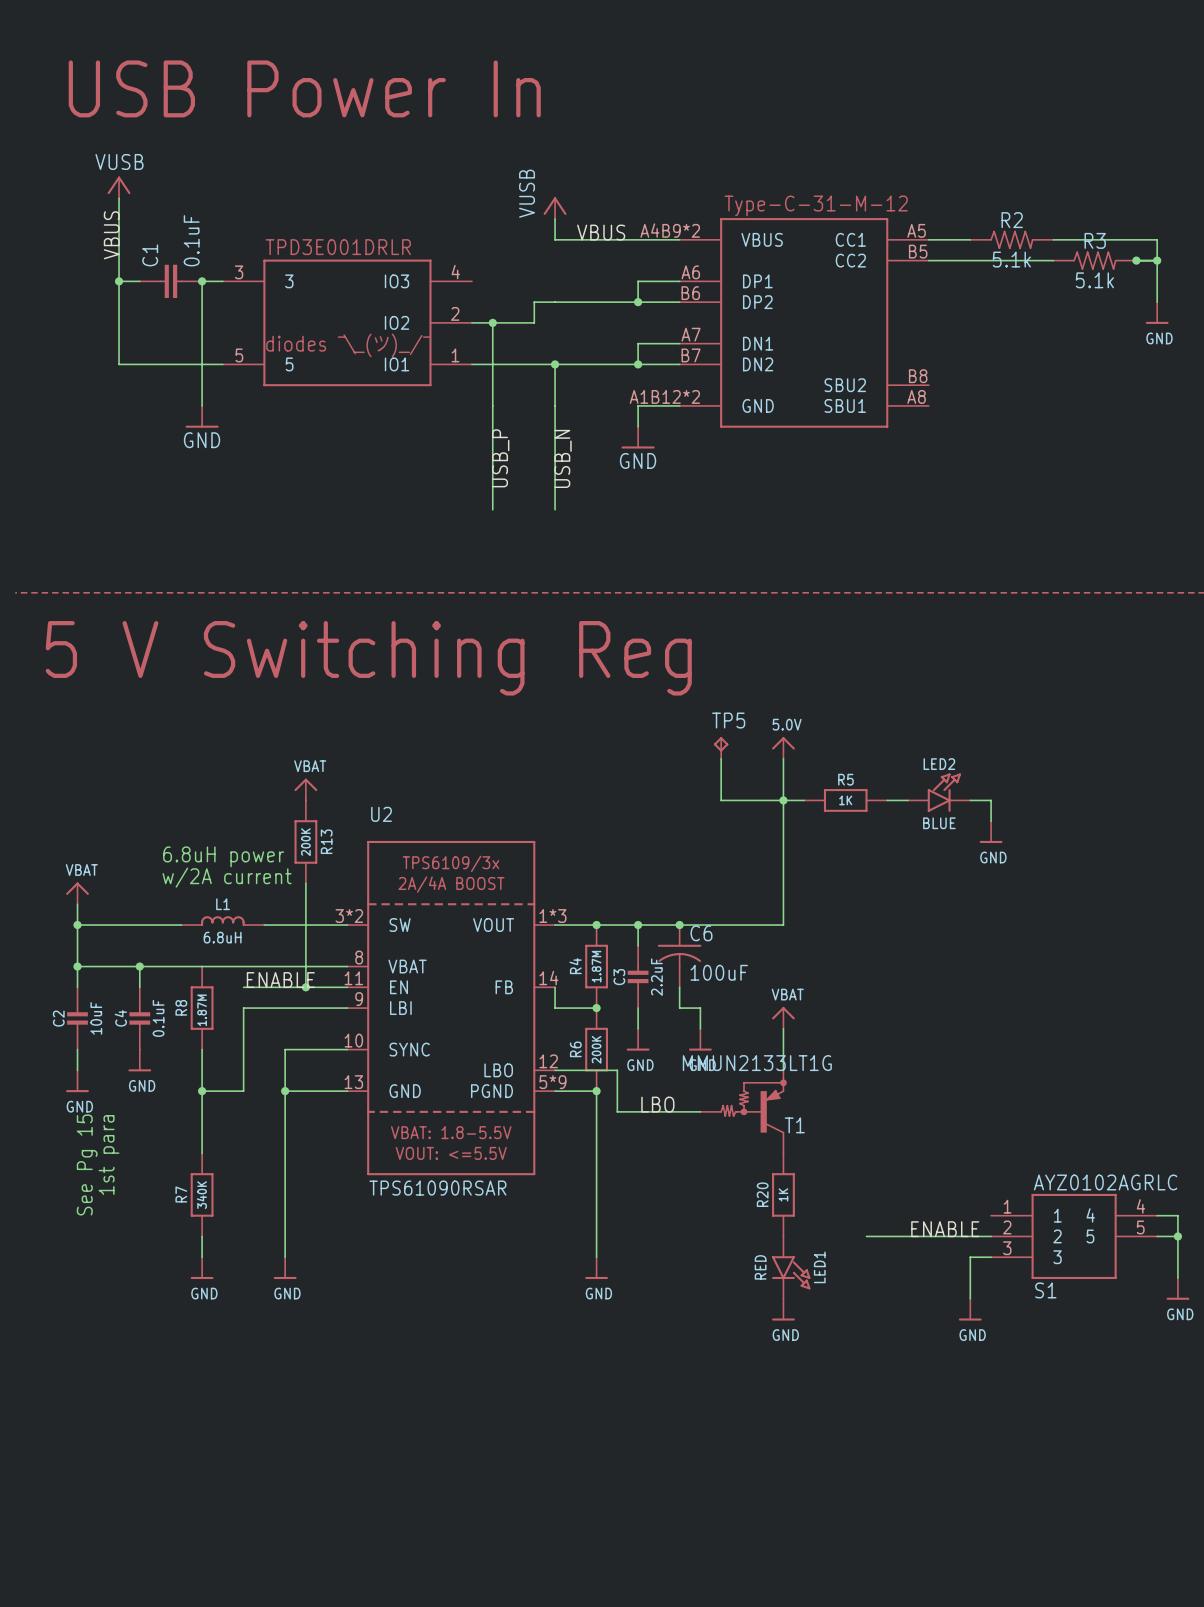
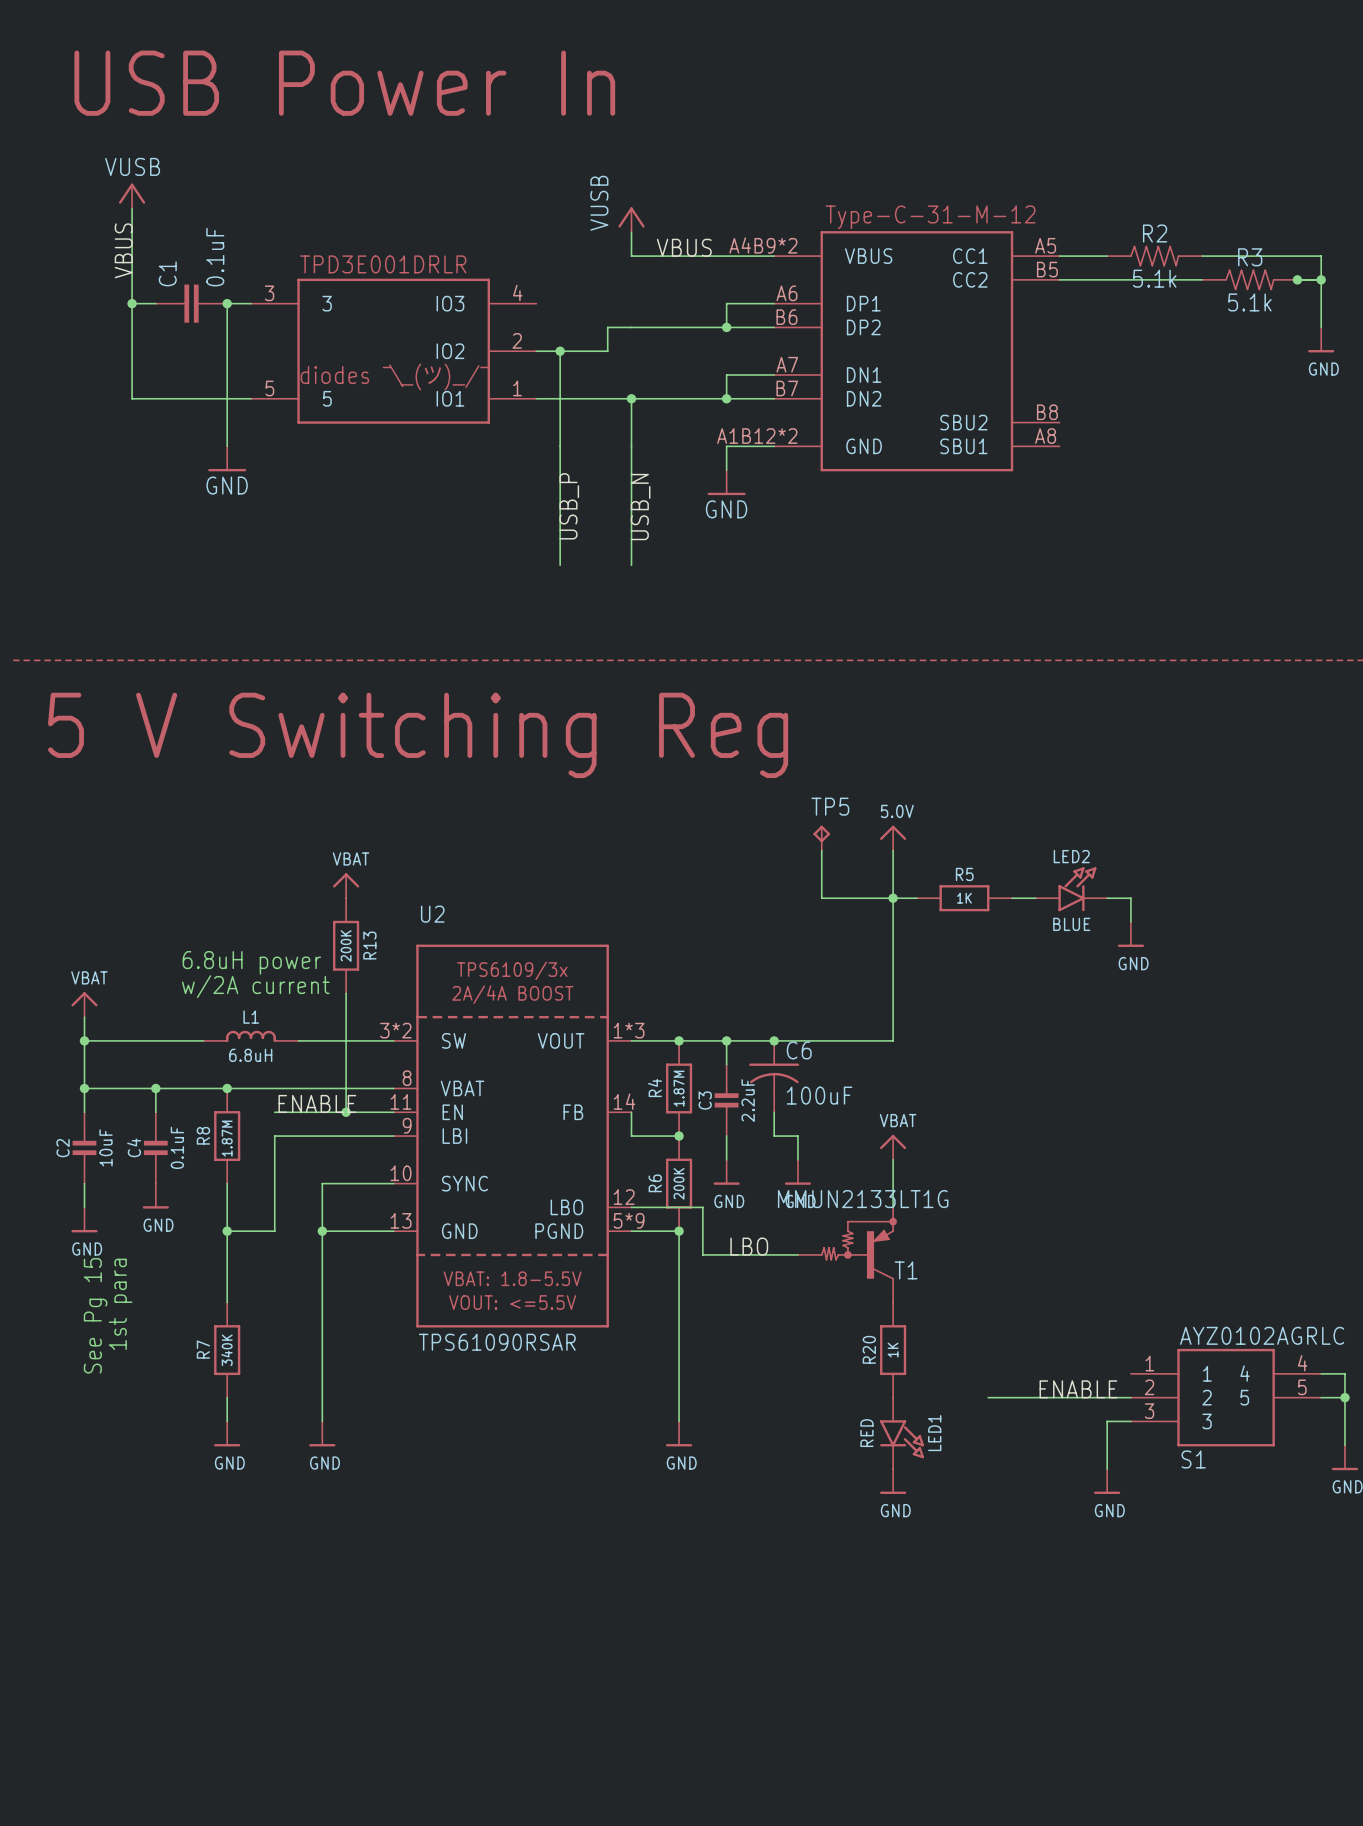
junction: none -> (227, 1088)

